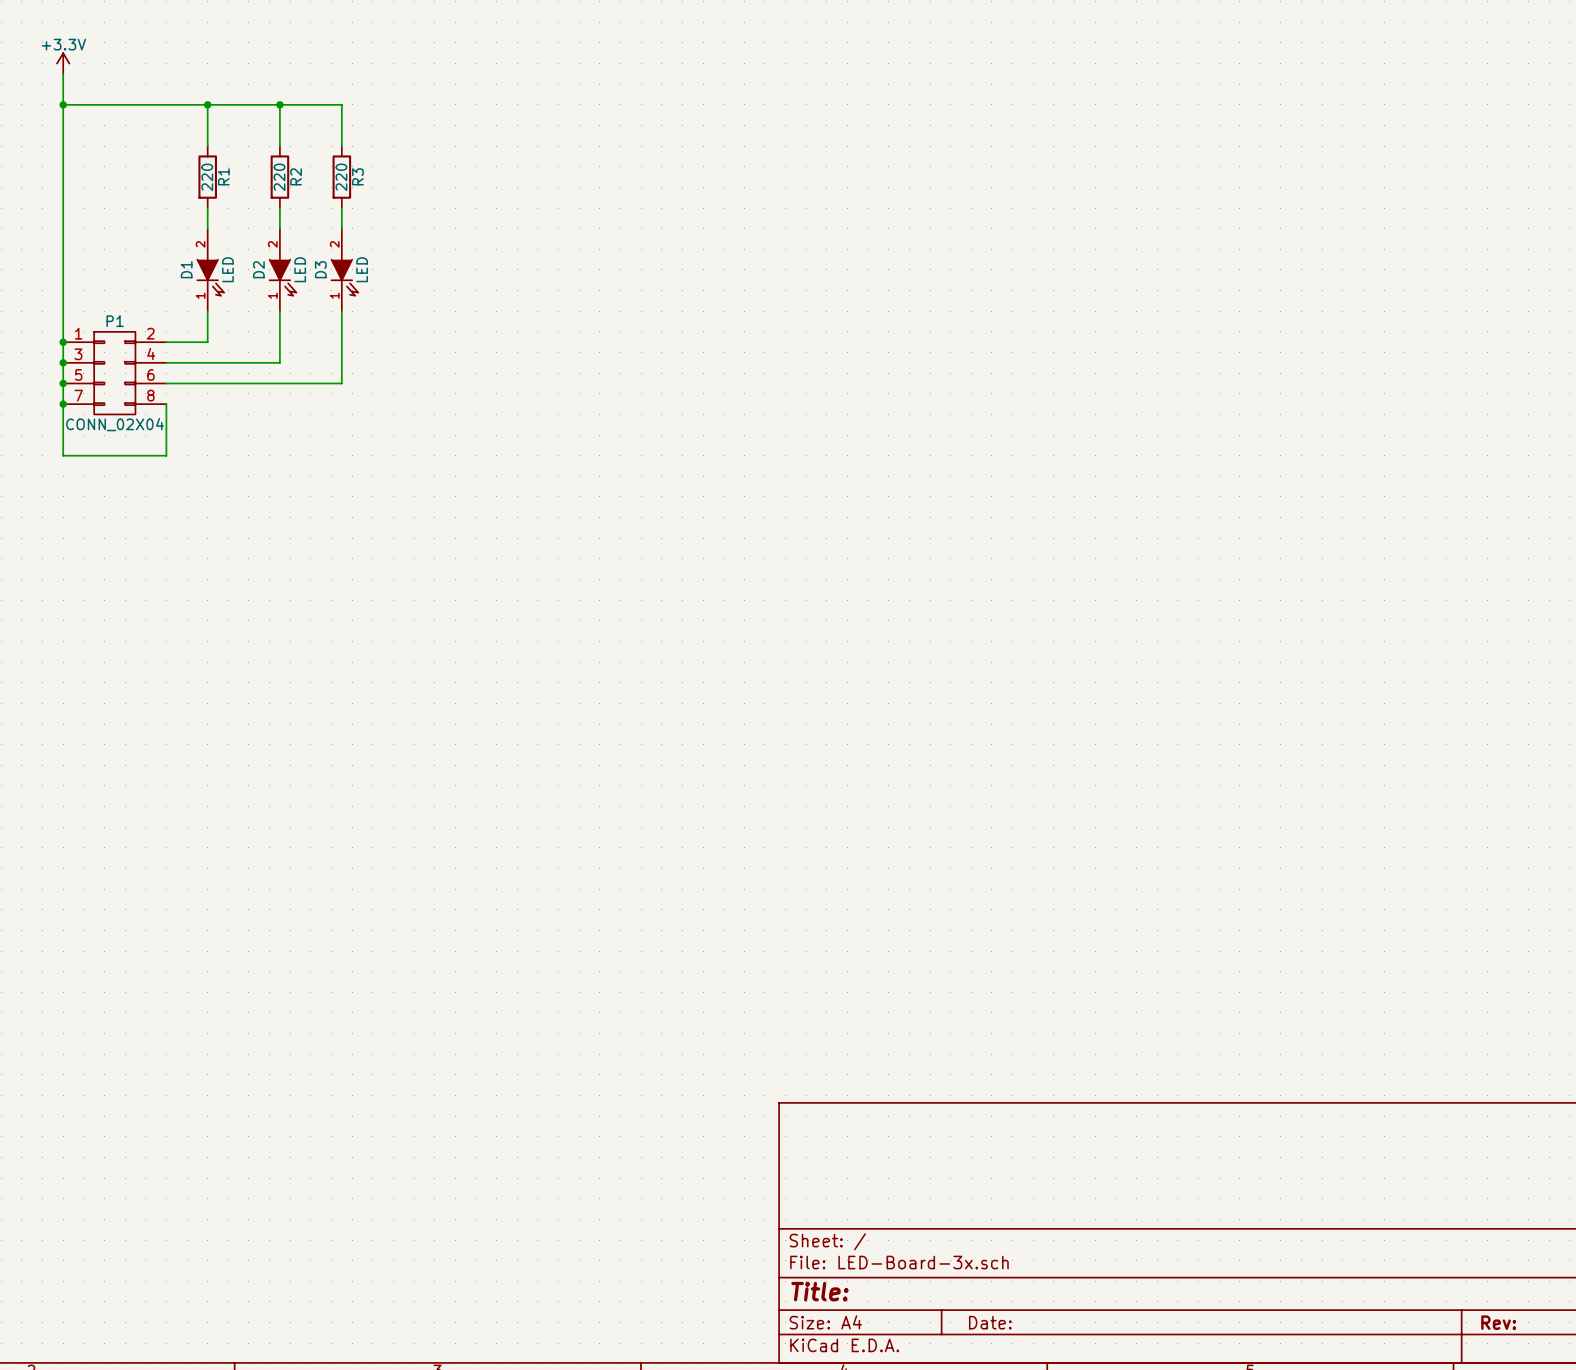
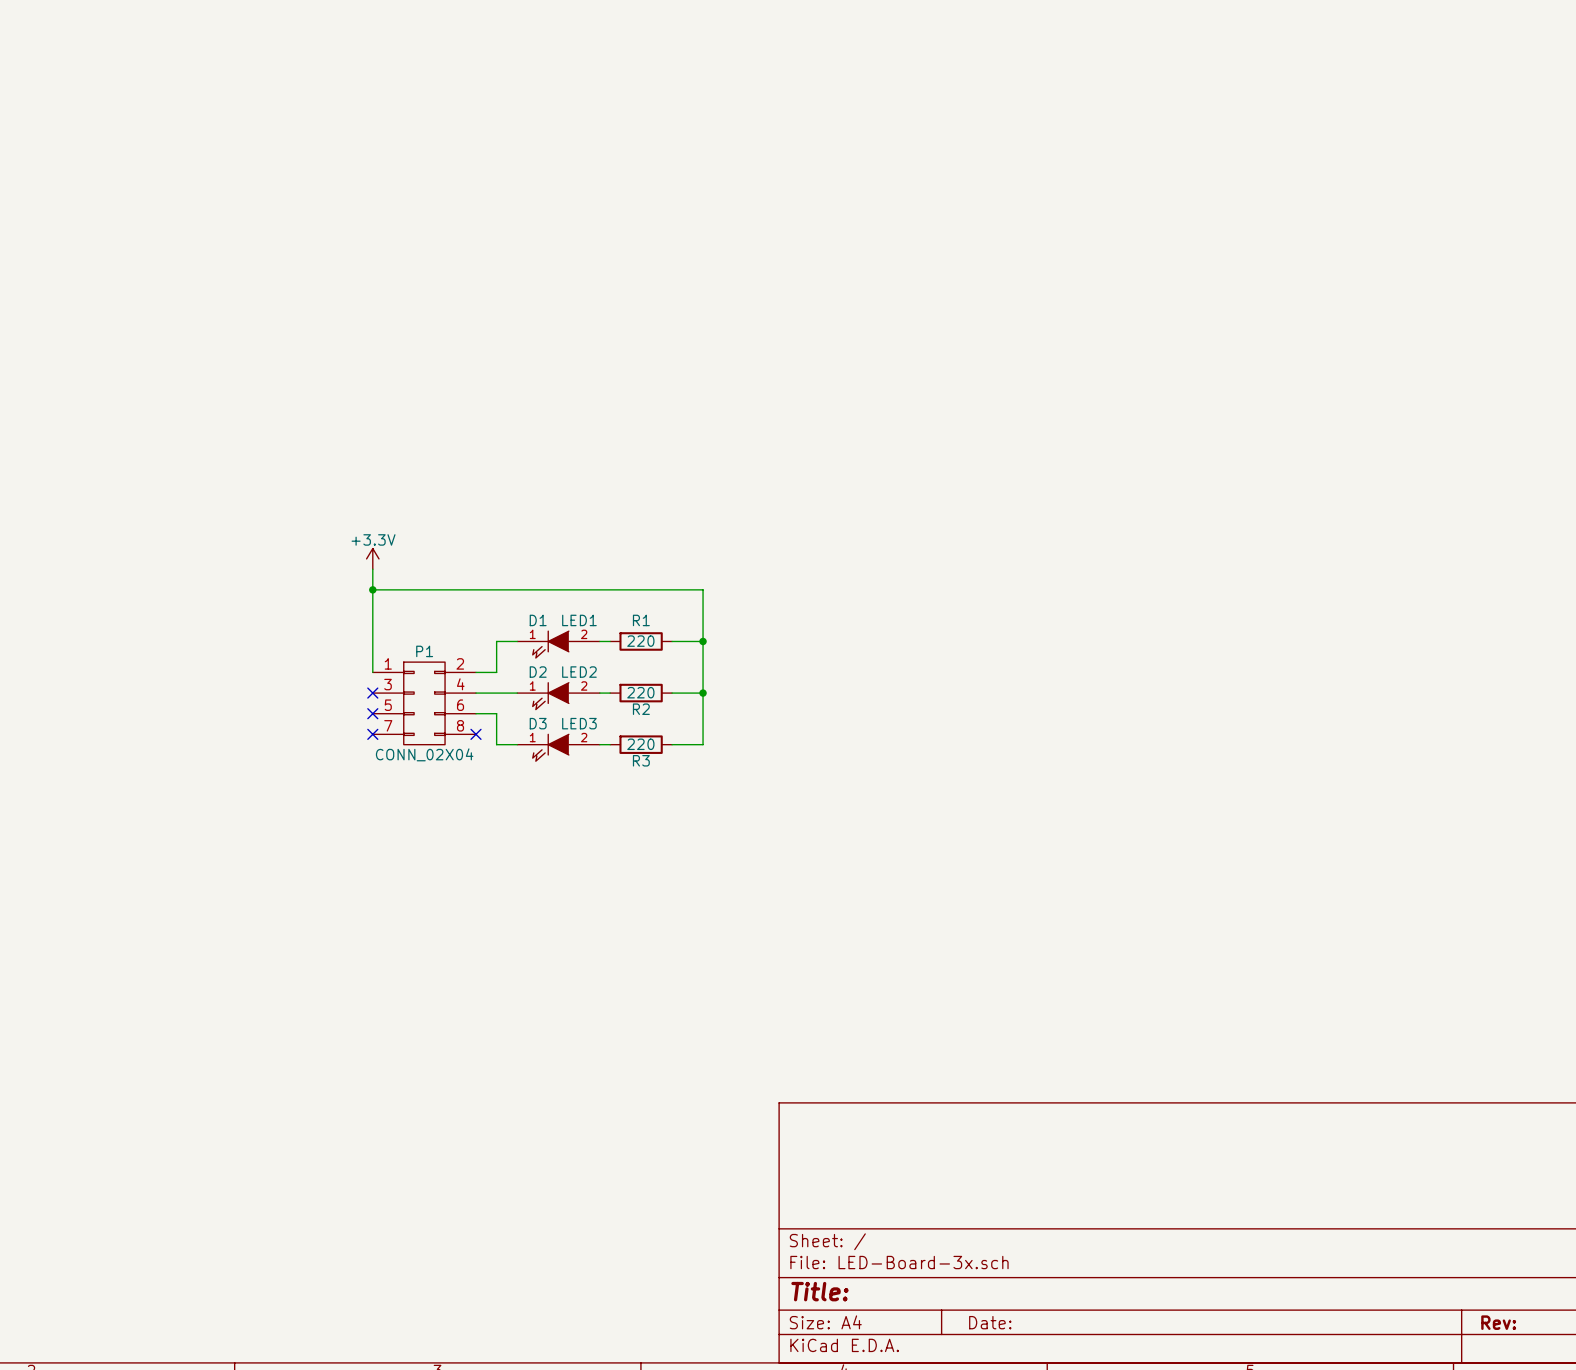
power symbol: +3.3V (63, 63) -> none
wire: (63, 73) (63, 455) (166, 455) (166, 404) -> none
wire: (63, 104) (341, 104) (341, 146) -> none
junction: (63, 104) -> none
wire: (207, 104) (207, 146) -> none
junction: (207, 104) -> none
wire: (279, 104) (279, 146) -> none
junction: (279, 104) -> none
R1 name position: R1 (223, 176) -> R1 (641, 620)
R1 rotation: 0° (207, 177) -> 90° clockwise (641, 641)
R1 position: (207, 177) -> (641, 641)
R2 rotation: 0° (279, 177) -> 90° clockwise (641, 693)
R2 position: (279, 177) -> (641, 693)
R3 rotation: 0° (341, 177) -> 90° clockwise (641, 744)
R3 position: (341, 177) -> (641, 744)
wire: (207, 208) (207, 228) -> none
wire: (279, 208) (279, 228) -> none
wire: (341, 208) (341, 228) -> none
D1 name position: D1 (186, 269) -> D1 (538, 620)
D1 position: (210, 269) -> (558, 644)
D1 value: LED (227, 269) -> LED1 (579, 620)
D2 name position: D2 (258, 269) -> D2 (538, 672)
D2 position: (283, 269) -> (558, 696)
D2 value: LED (300, 269) -> LED2 (579, 672)
D3 name position: D3 (320, 269) -> D3 (538, 723)
D3 position: (344, 269) -> (558, 747)
D3 value: LED (362, 269) -> LED3 (579, 723)
D1 rotation: 0° (210, 277) -> 90° clockwise (550, 644)
D2 rotation: 0° (283, 277) -> 90° clockwise (550, 696)
D3 rotation: 0° (344, 277) -> 90° clockwise (550, 747)
wire: (207, 311) (207, 342) (166, 342) -> none
wire: (279, 311) (279, 362) (166, 362) -> none
wire: (341, 311) (341, 383) (166, 383) -> none
junction: (63, 342) -> none
junction: (63, 362) -> none
P1 position: (114, 373) -> (424, 703)
junction: (63, 383) -> none
junction: (63, 404) -> none
power symbol: none -> +3.3V (372, 558)
wire: none -> (372, 569) (372, 672)
wire: none -> (372, 589) (703, 589) (703, 744) (672, 744)
junction: none -> (372, 589)
wire: none -> (517, 641) (496, 641) (496, 672) (475, 672)
wire: none -> (599, 641) (610, 641)
wire: none -> (672, 641) (703, 641)
junction: none -> (703, 641)
no-connect mark: none -> (372, 693)
wire: none -> (475, 693) (517, 693)
wire: none -> (599, 693) (610, 693)
wire: none -> (672, 693) (703, 693)
junction: none -> (703, 693)
no-connect mark: none -> (372, 713)
wire: none -> (475, 713) (496, 713) (496, 744) (517, 744)
no-connect mark: none -> (372, 734)
no-connect mark: none -> (475, 734)
wire: none -> (599, 744) (610, 744)

